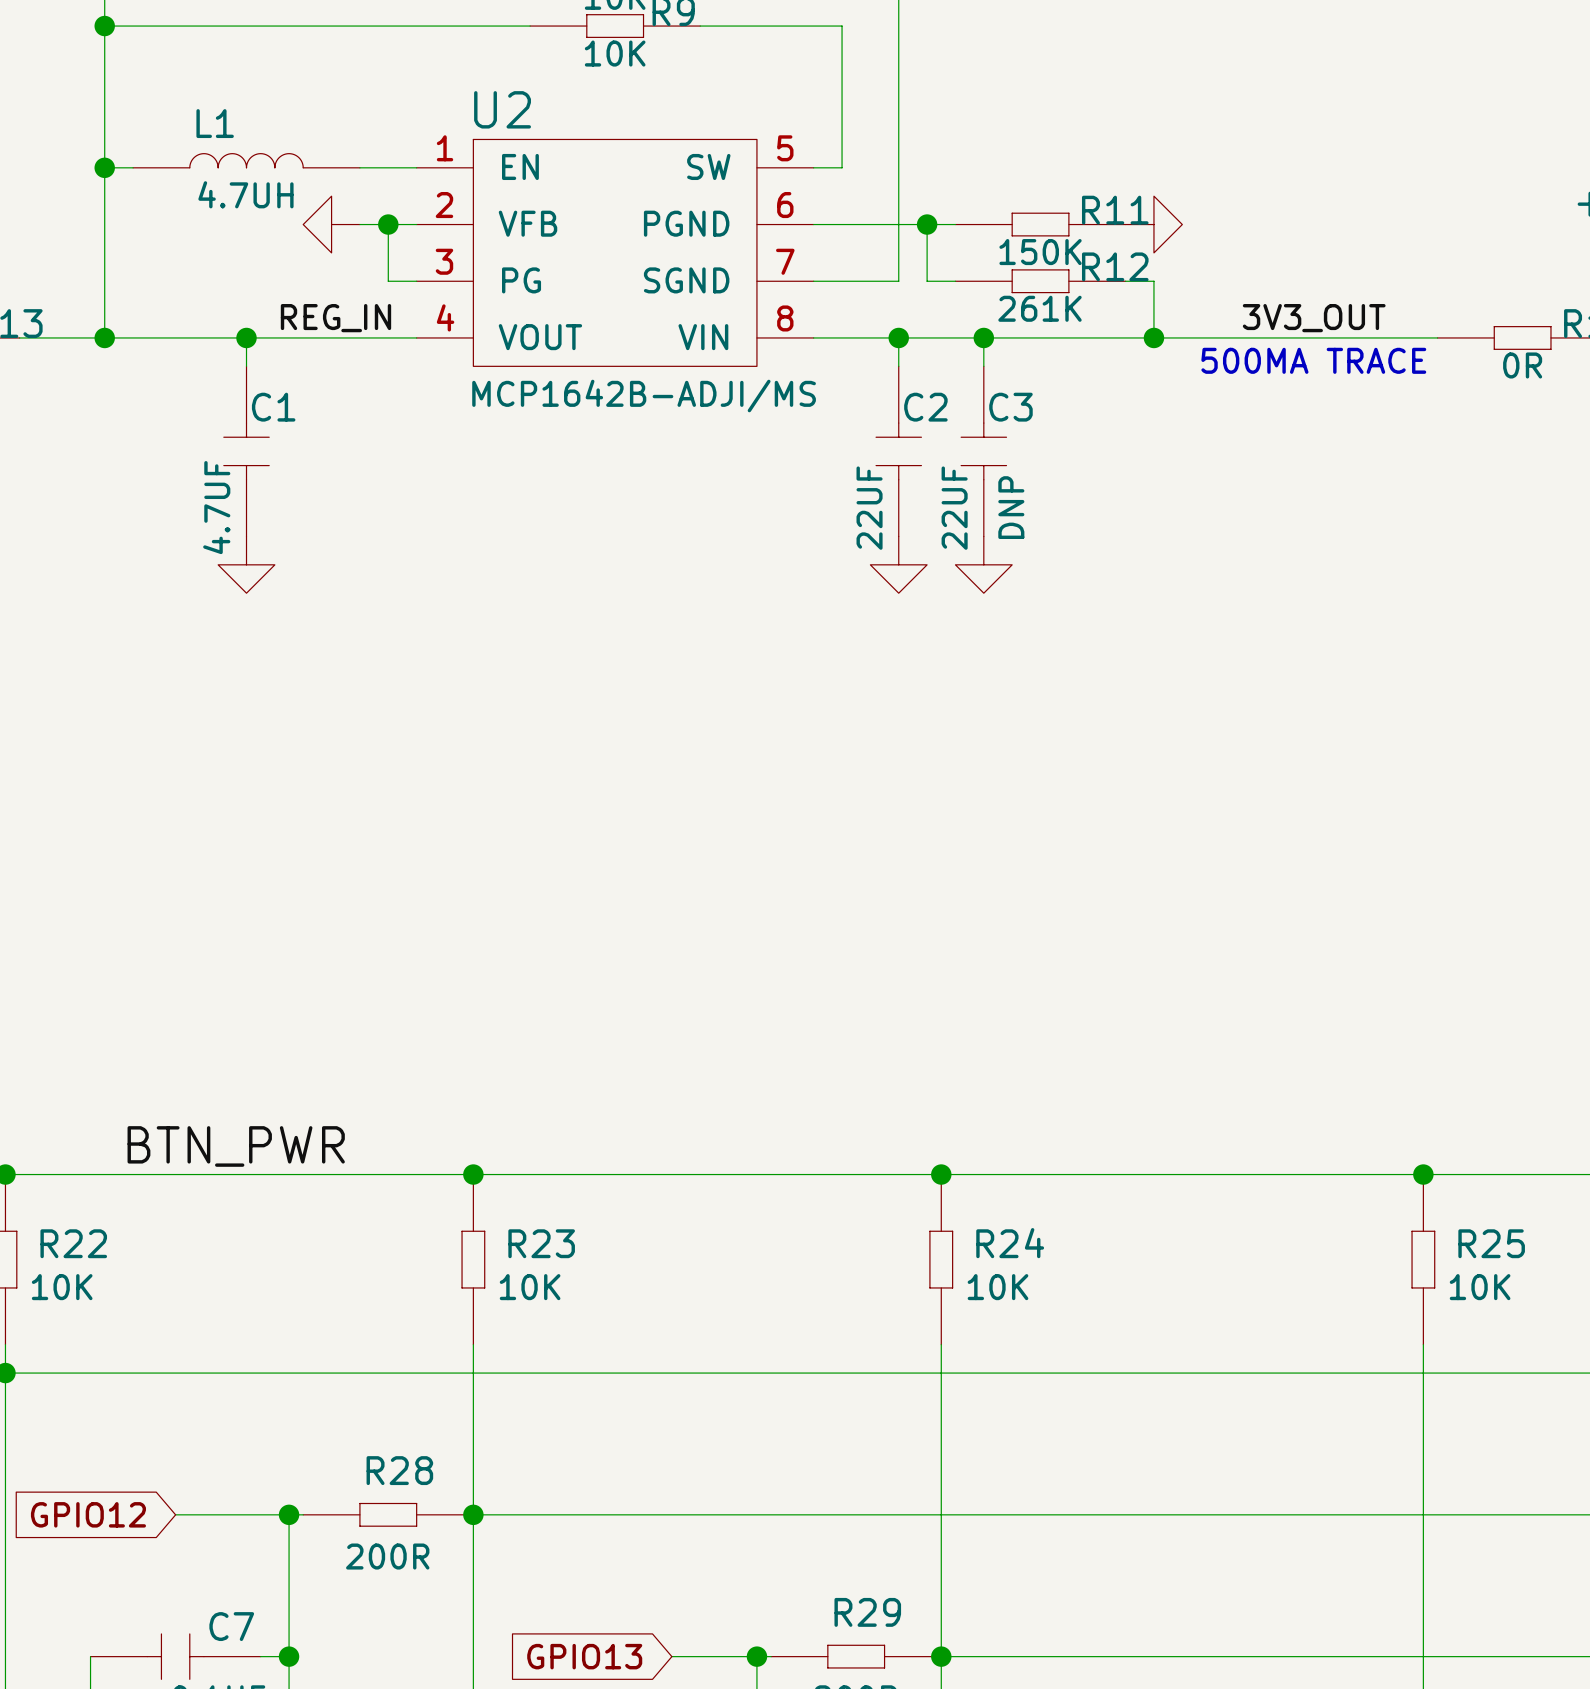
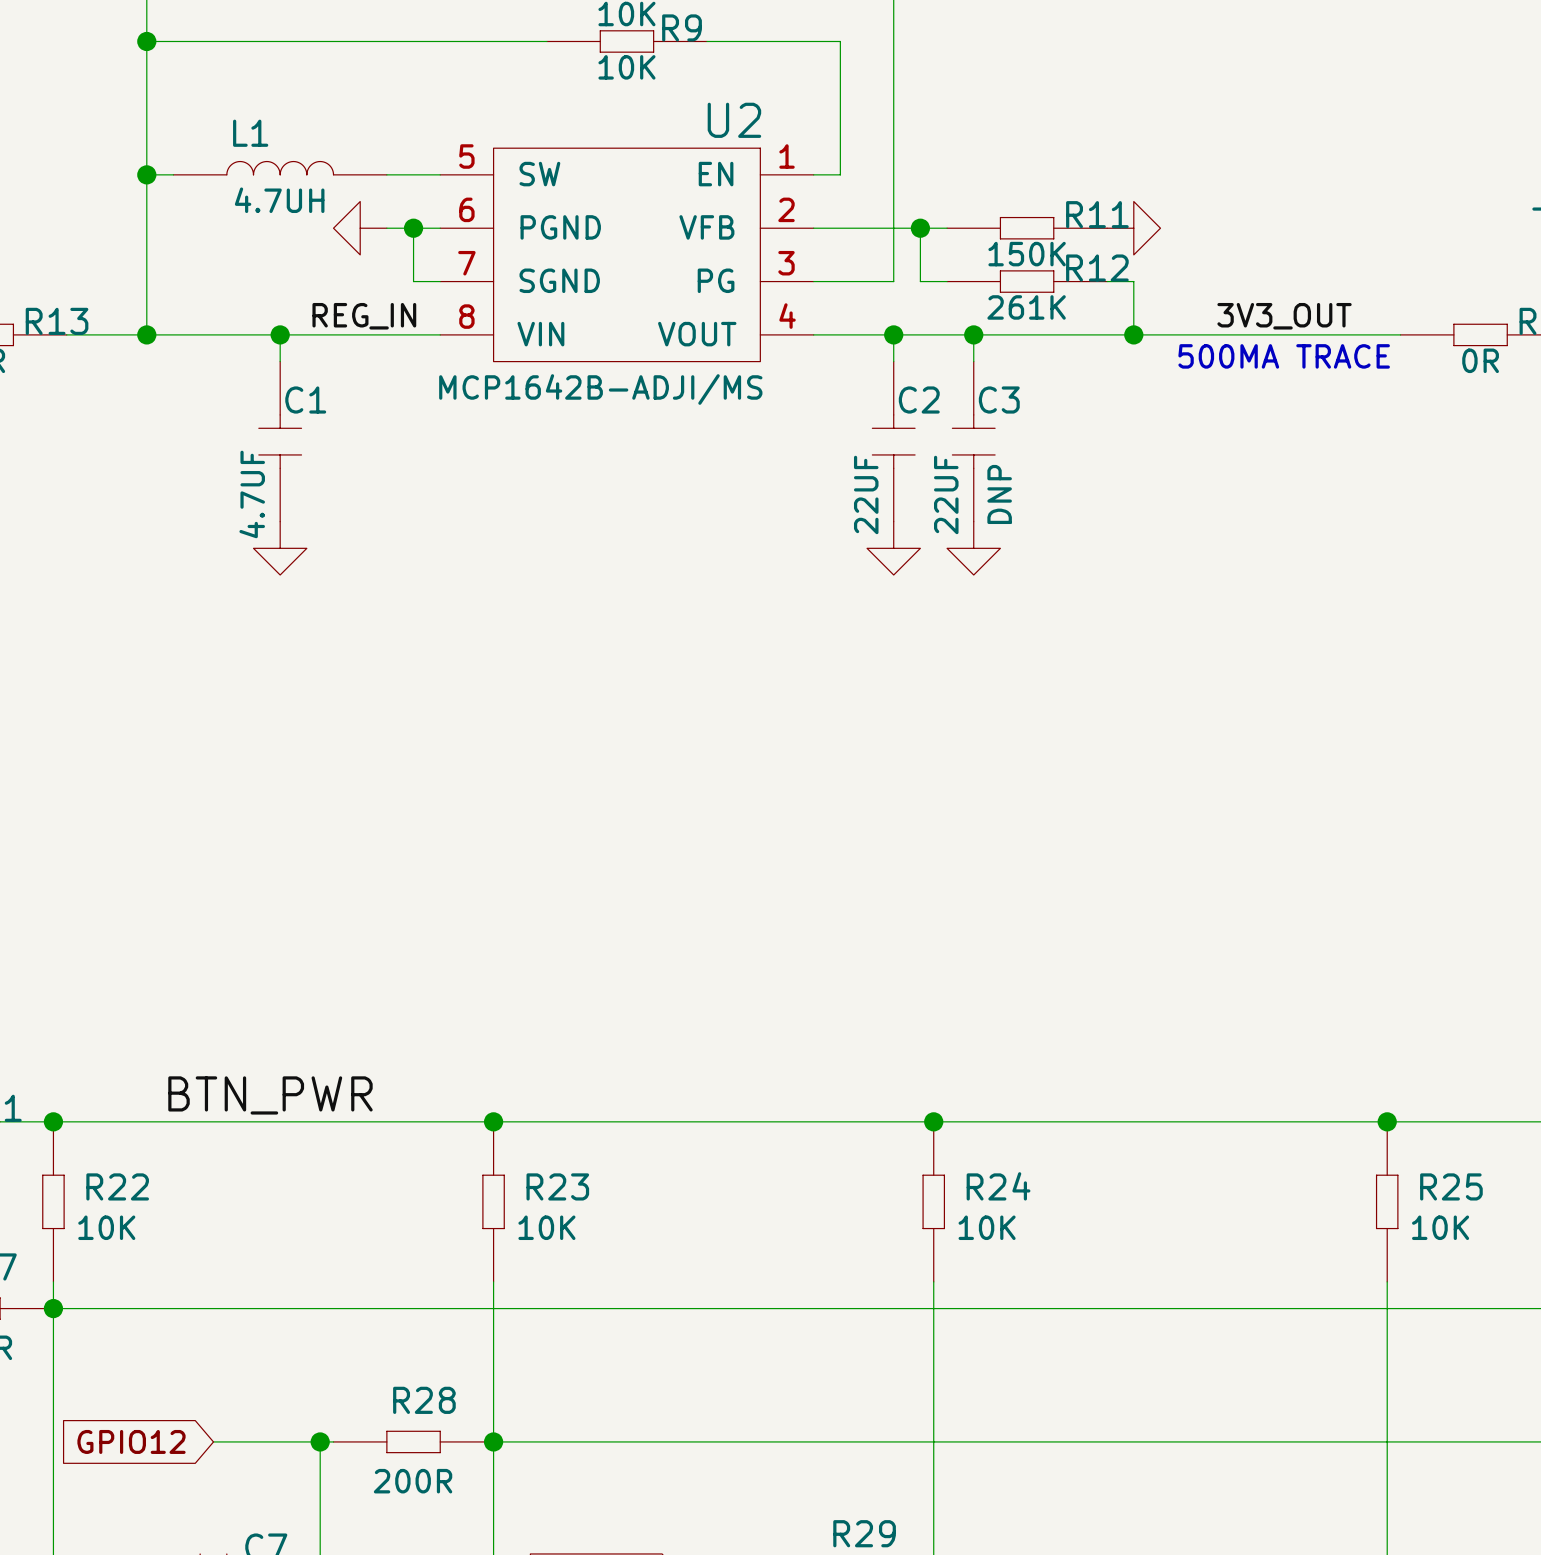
U2 flip: as is (615, 252) -> left-right (626, 254)

